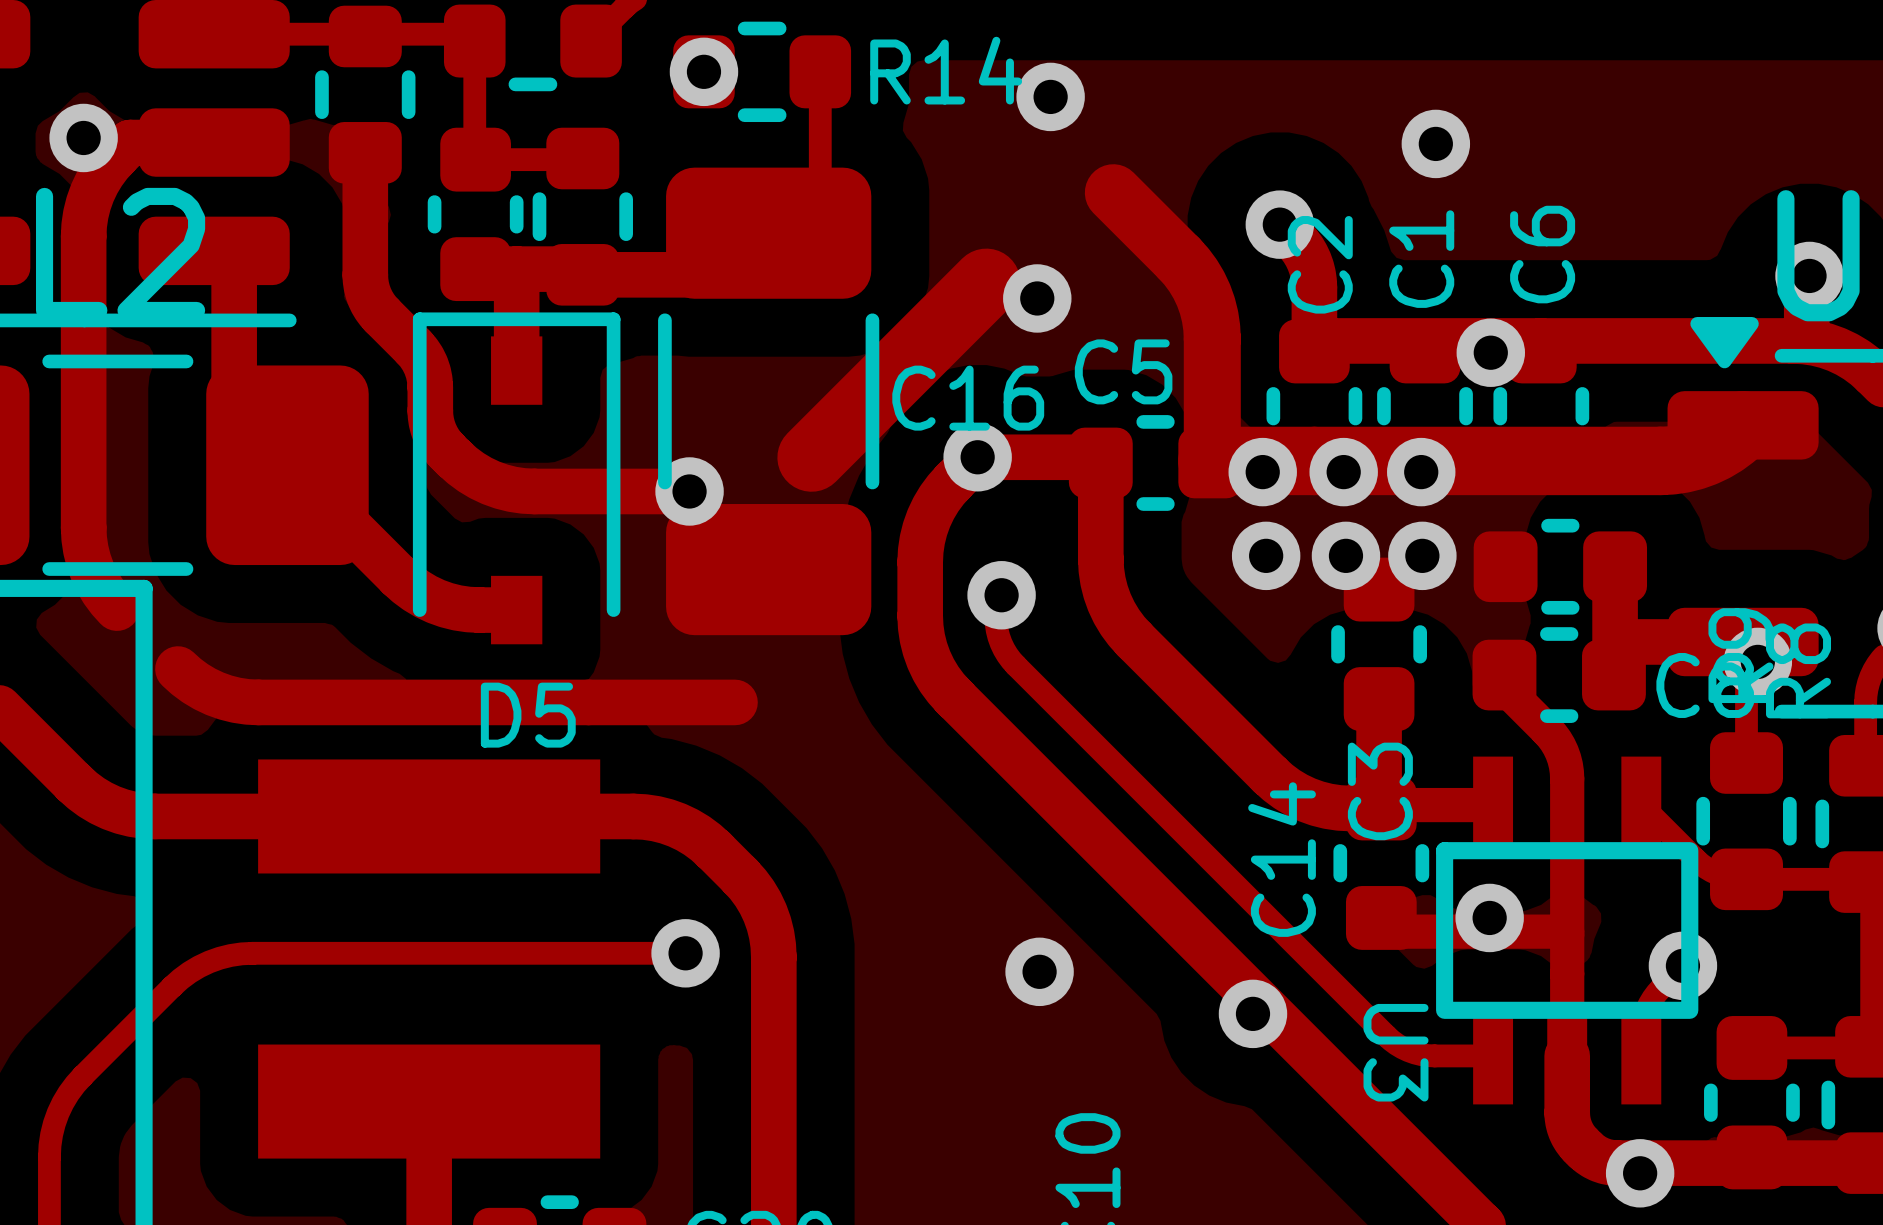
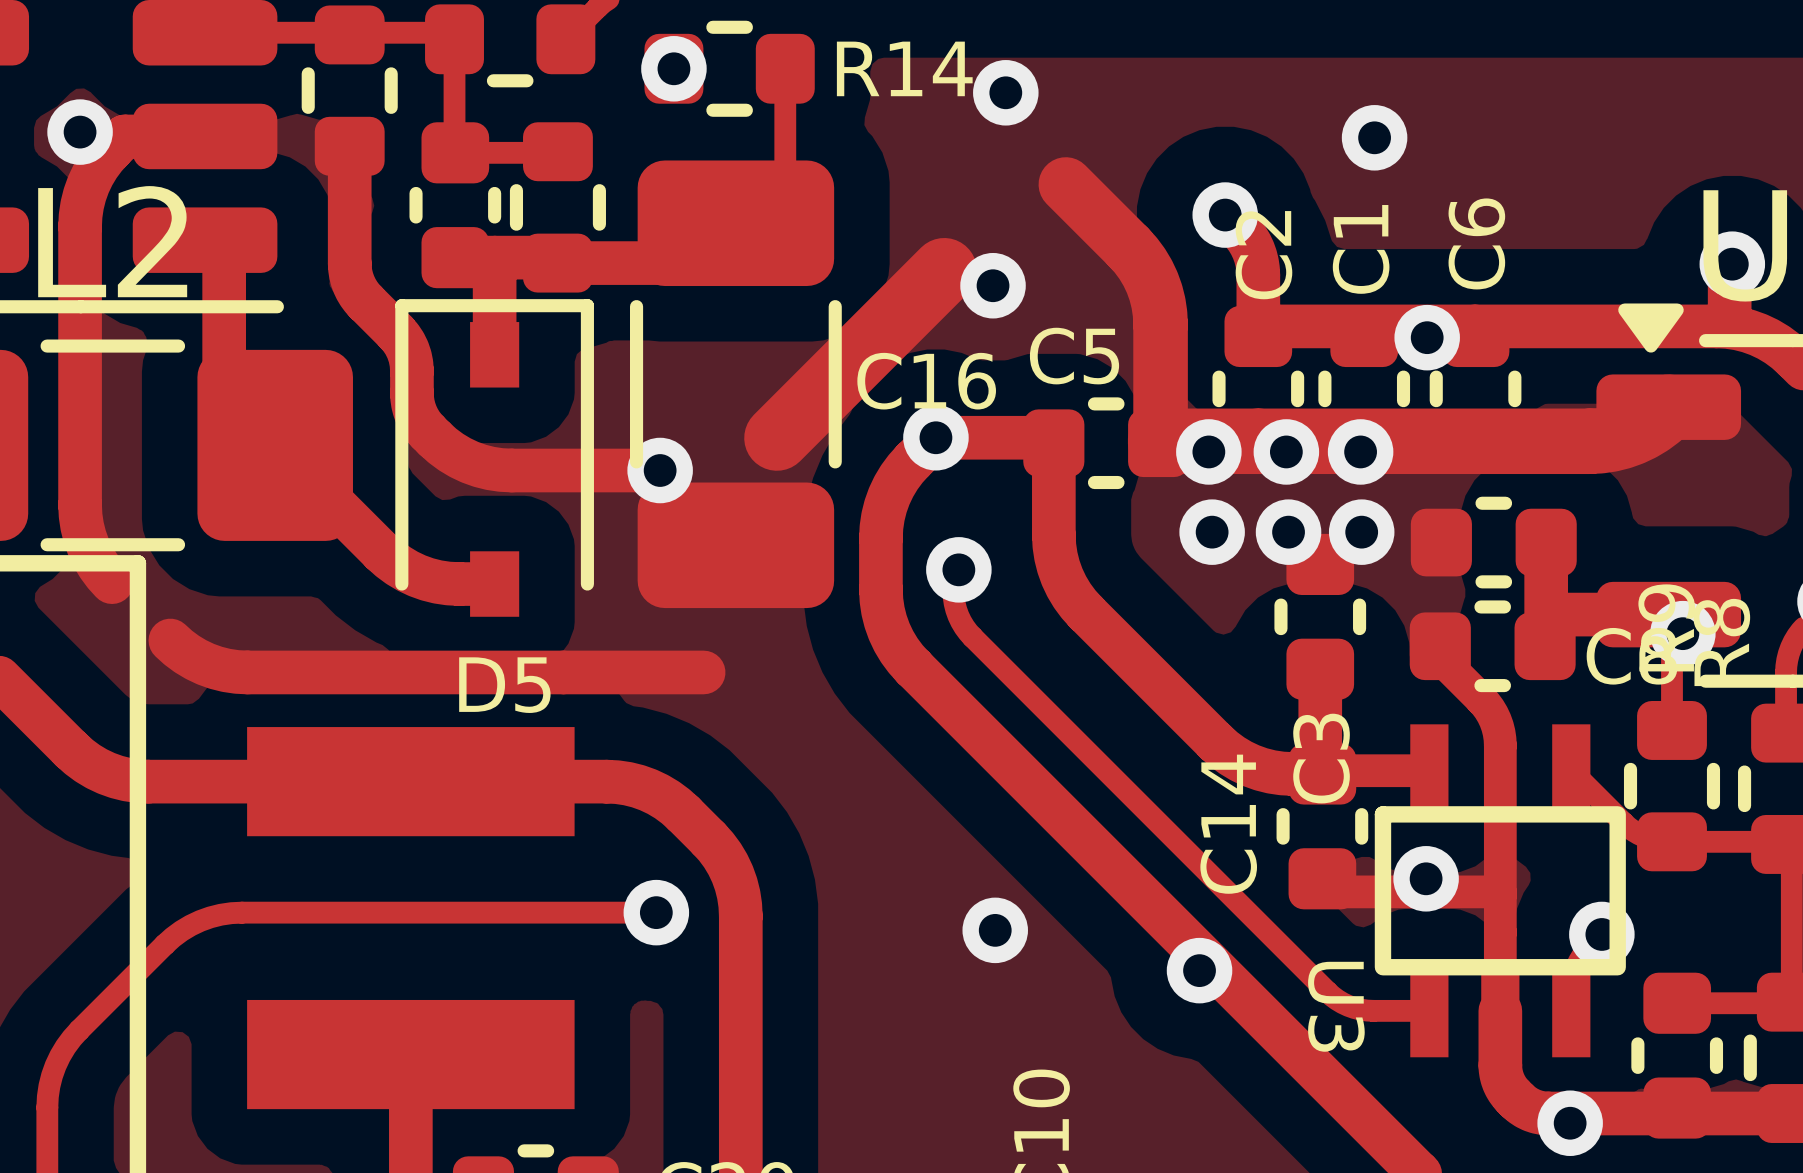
via position: (1682, 965) -> (1601, 934)

